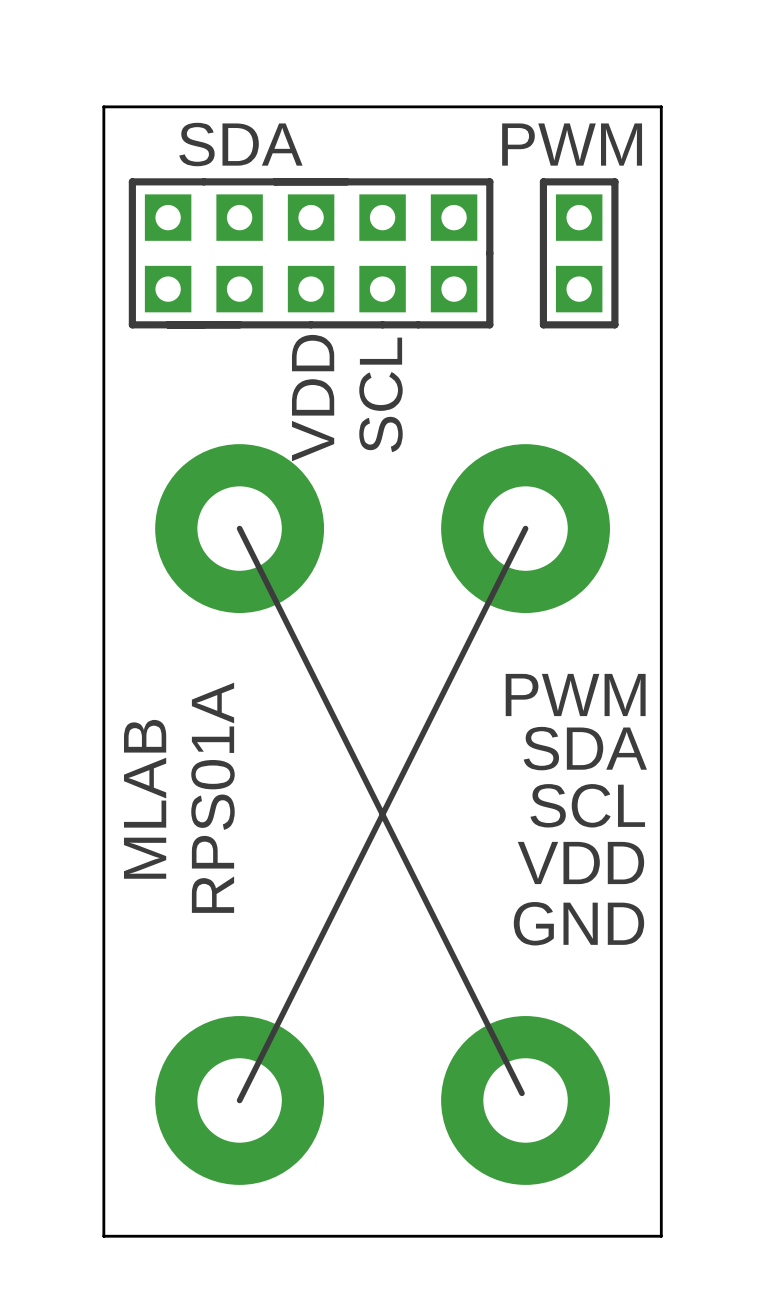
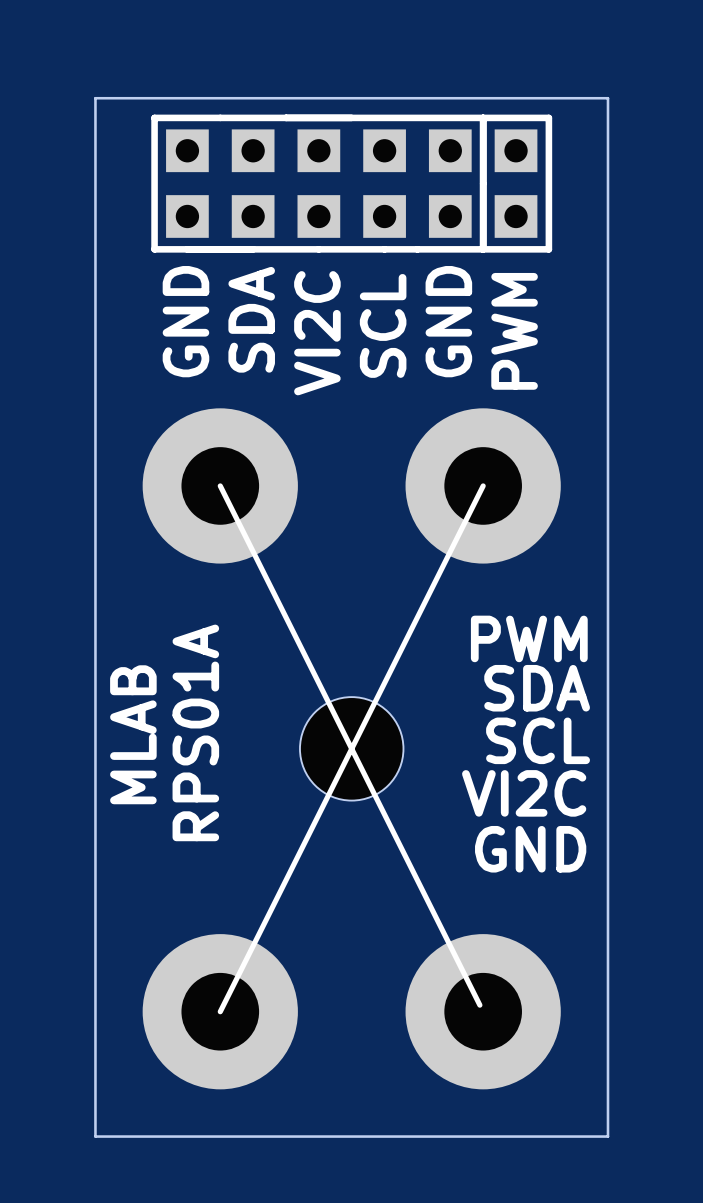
text rotation: 0° (240, 144) -> 90° counterclockwise (251, 319)
text position: SDA (240, 144) -> SDA (251, 319)
text rotation: 0° (572, 144) -> 90° counterclockwise (514, 331)
text position: PWM (572, 144) -> PWM (514, 331)
part position: (311, 253) -> (318, 183)
part position: (579, 253) -> (516, 183)
text: none -> GND (185, 321)
text: none -> GND (448, 321)
text: none -> VI2C (317, 333)
text position: SCL (380, 394) -> SCL (383, 325)
text: VDD (313, 398) -> none
part: none -> (351, 748)
text: VDD (580, 862) -> VI2C (524, 793)

